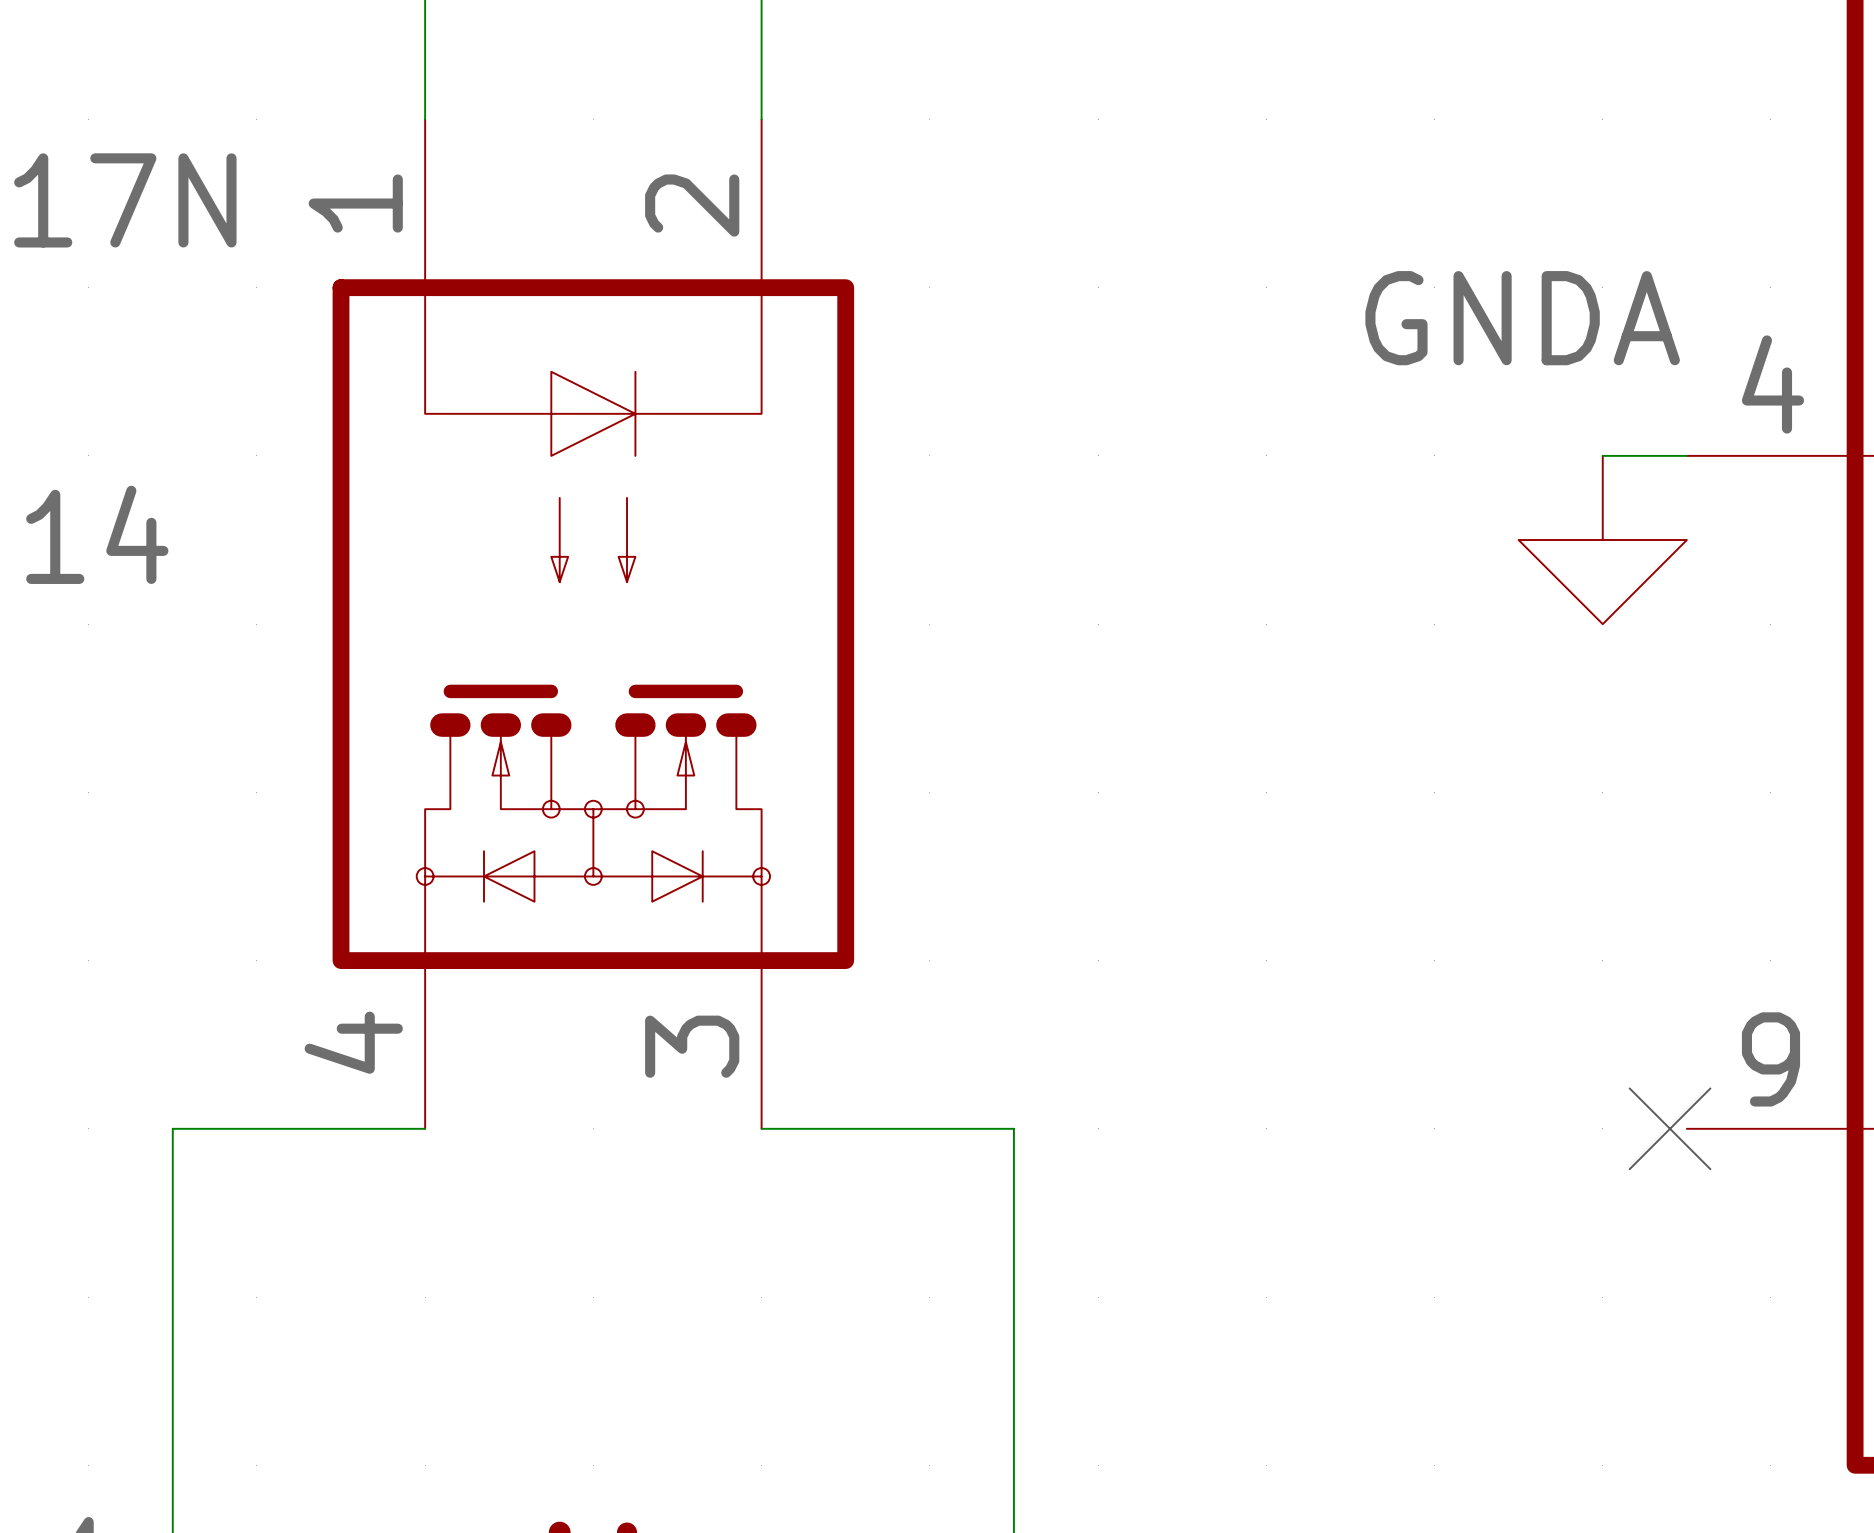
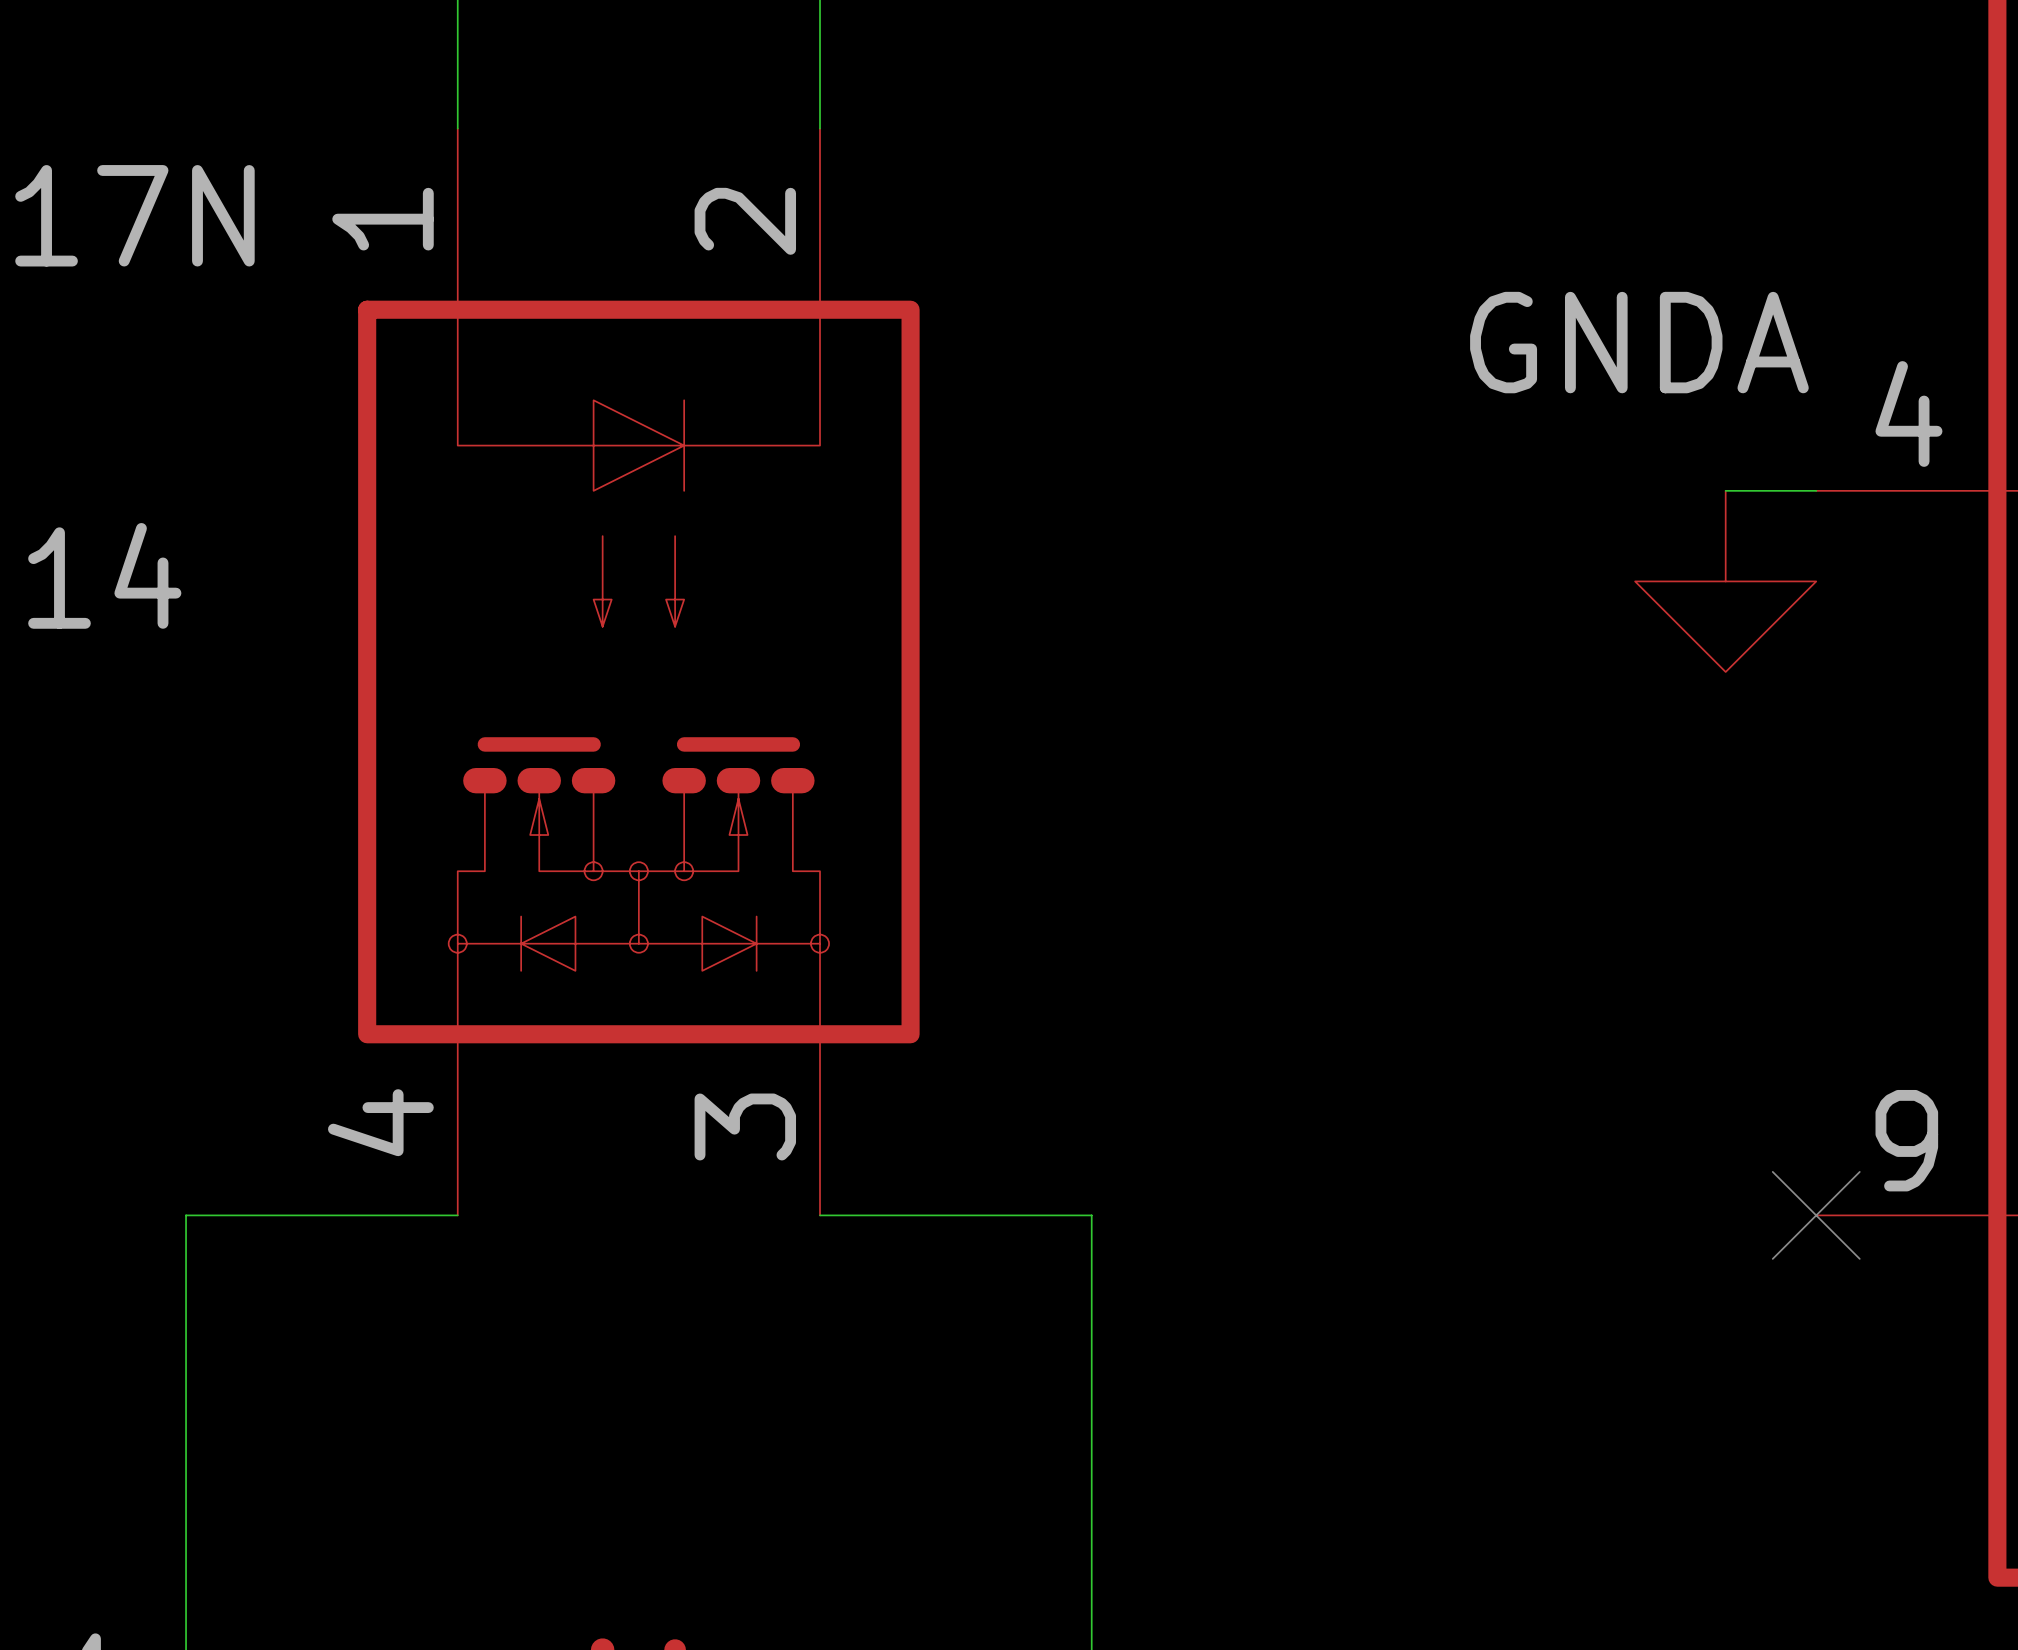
no-connect mark position: (1670, 1128) -> (1816, 1215)

